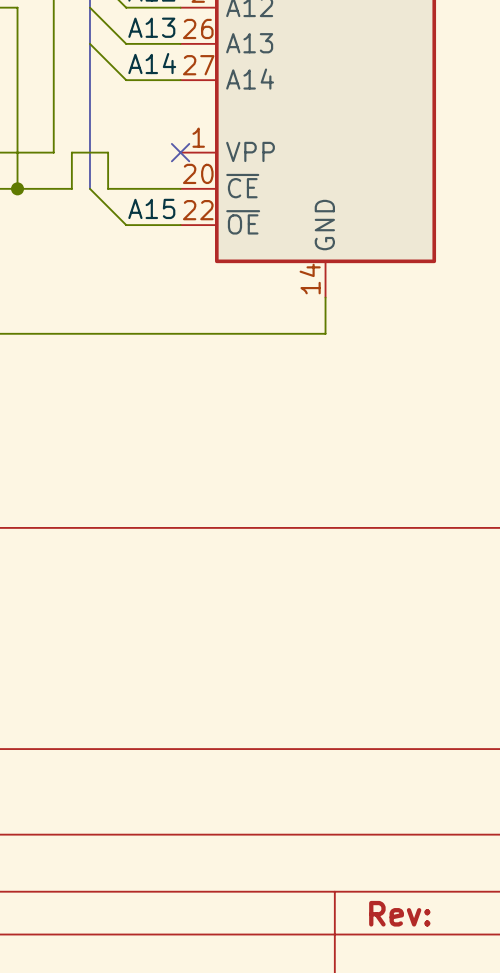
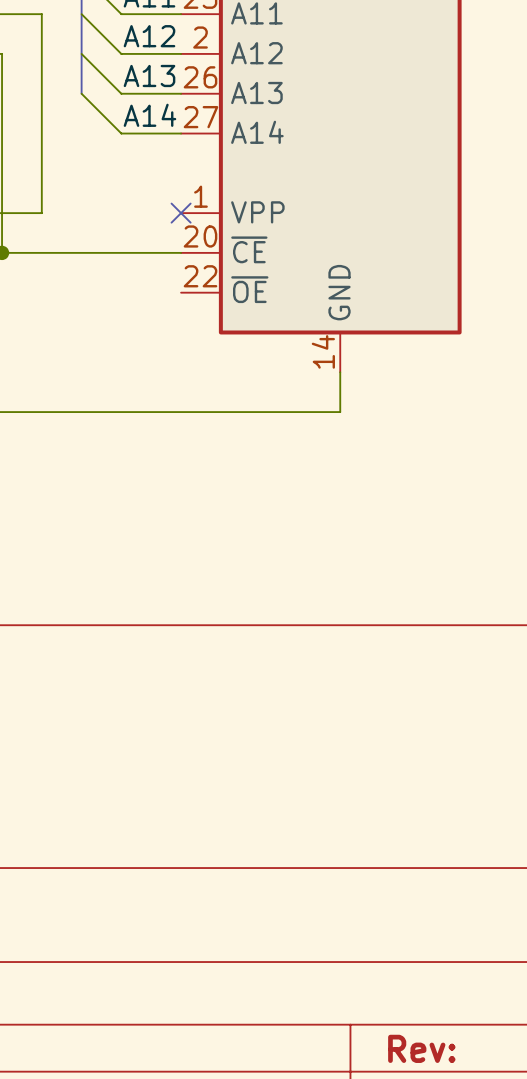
bus: (89, 43) (89, 188) -> none
wire: (71, 188) (71, 152) (108, 152) (108, 188) -> (61, 252) (101, 252)
wire: (89, 188) (126, 225) (180, 225) -> none
label: A15 (151, 208) -> none

